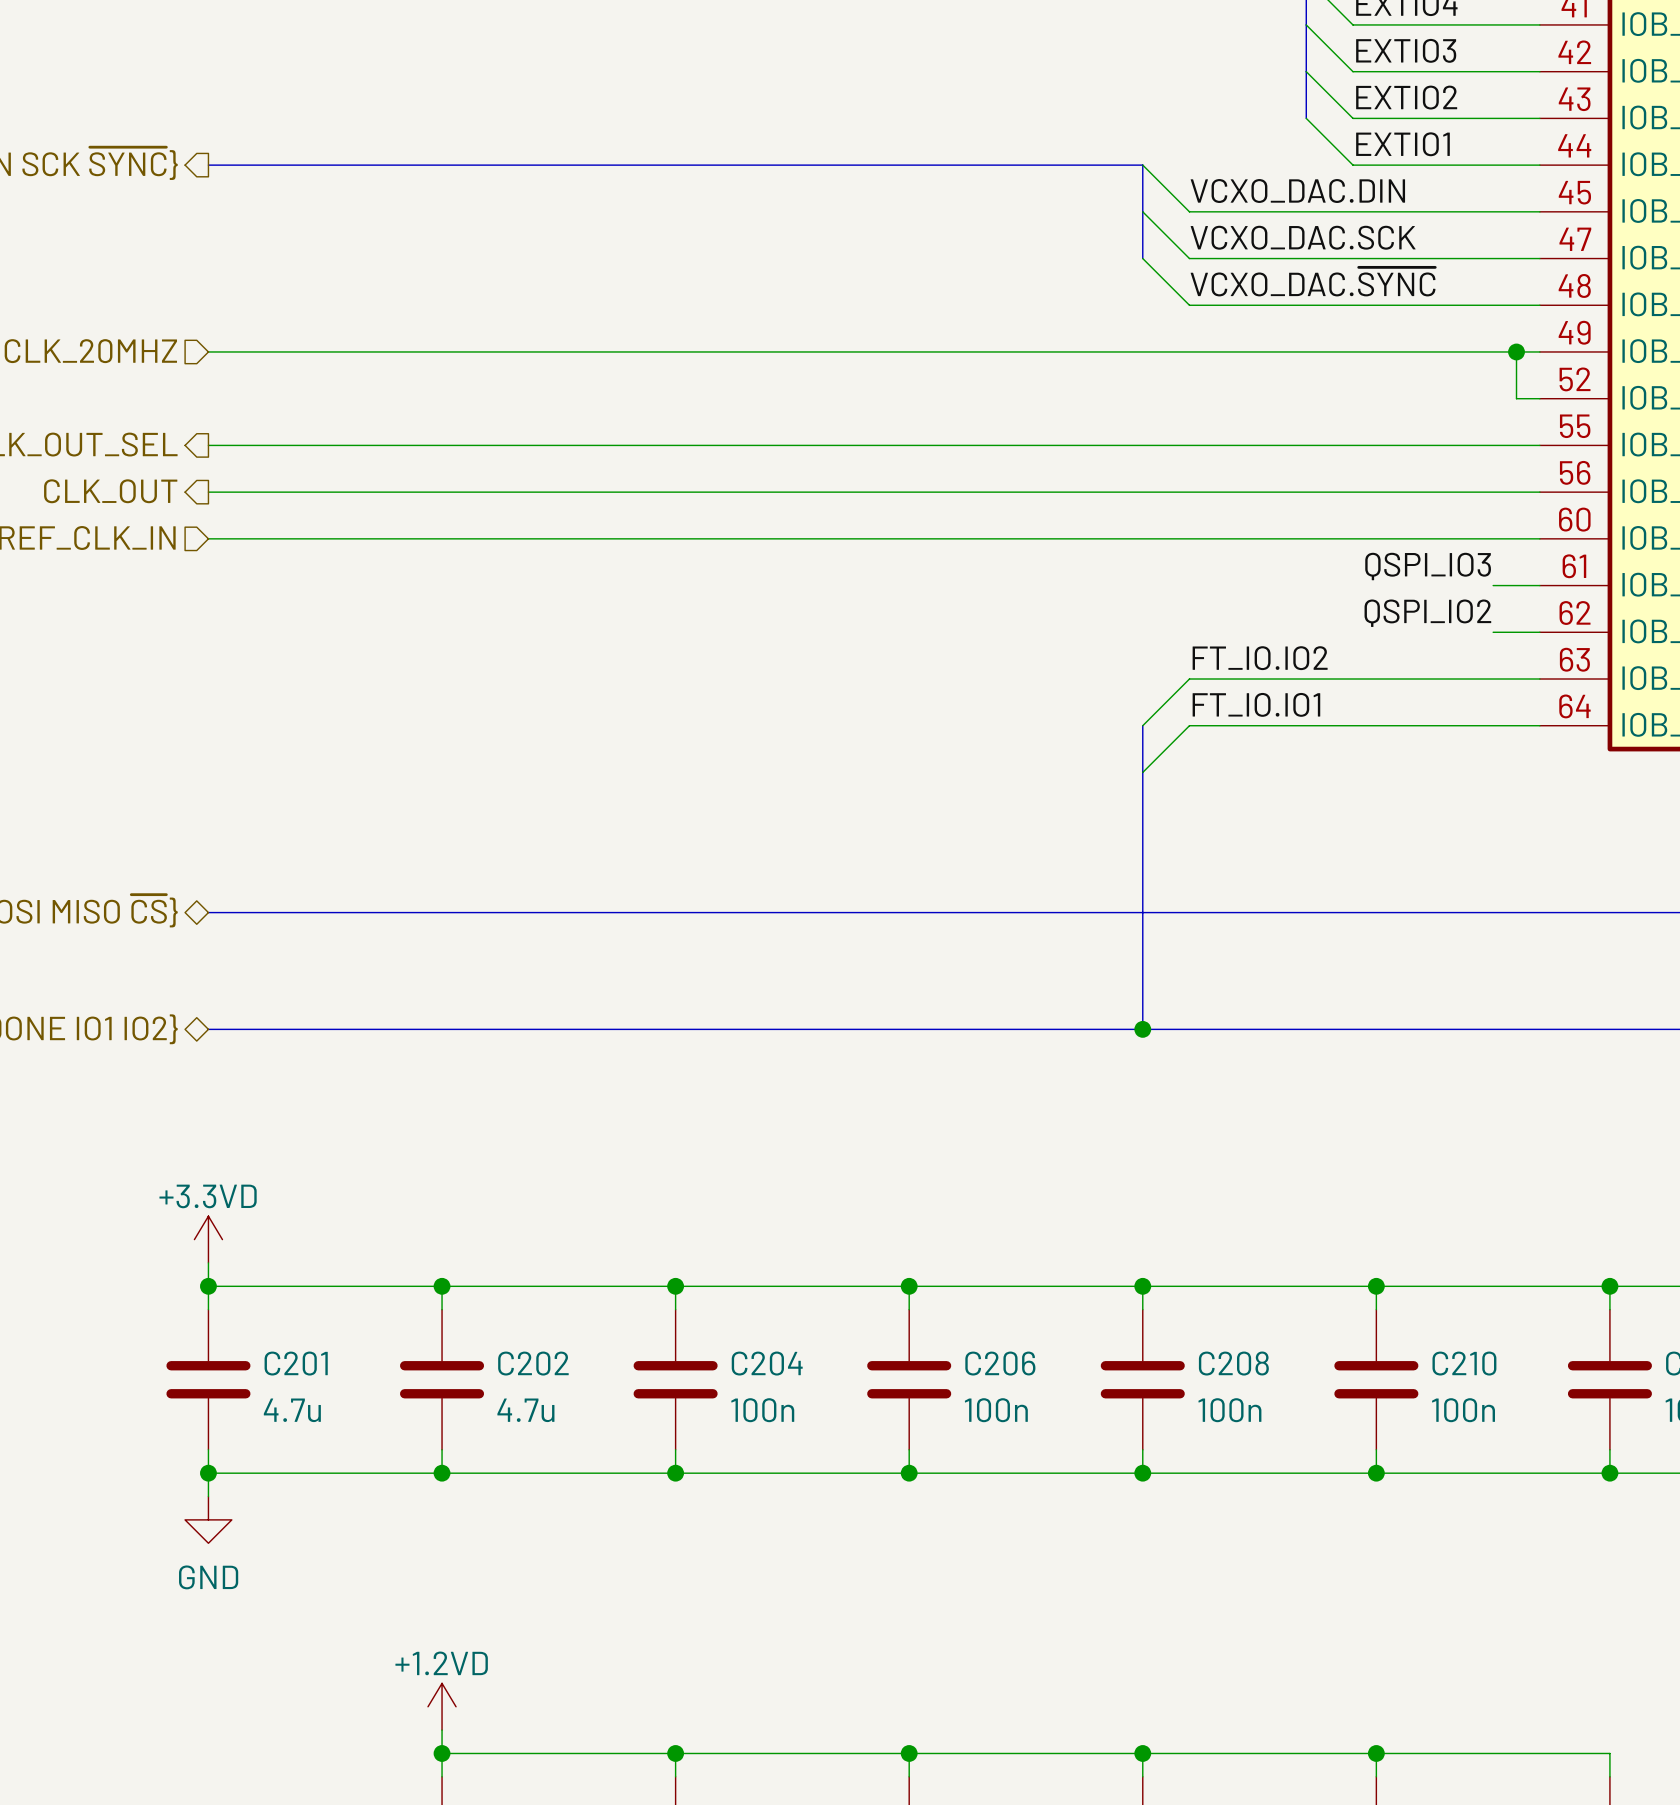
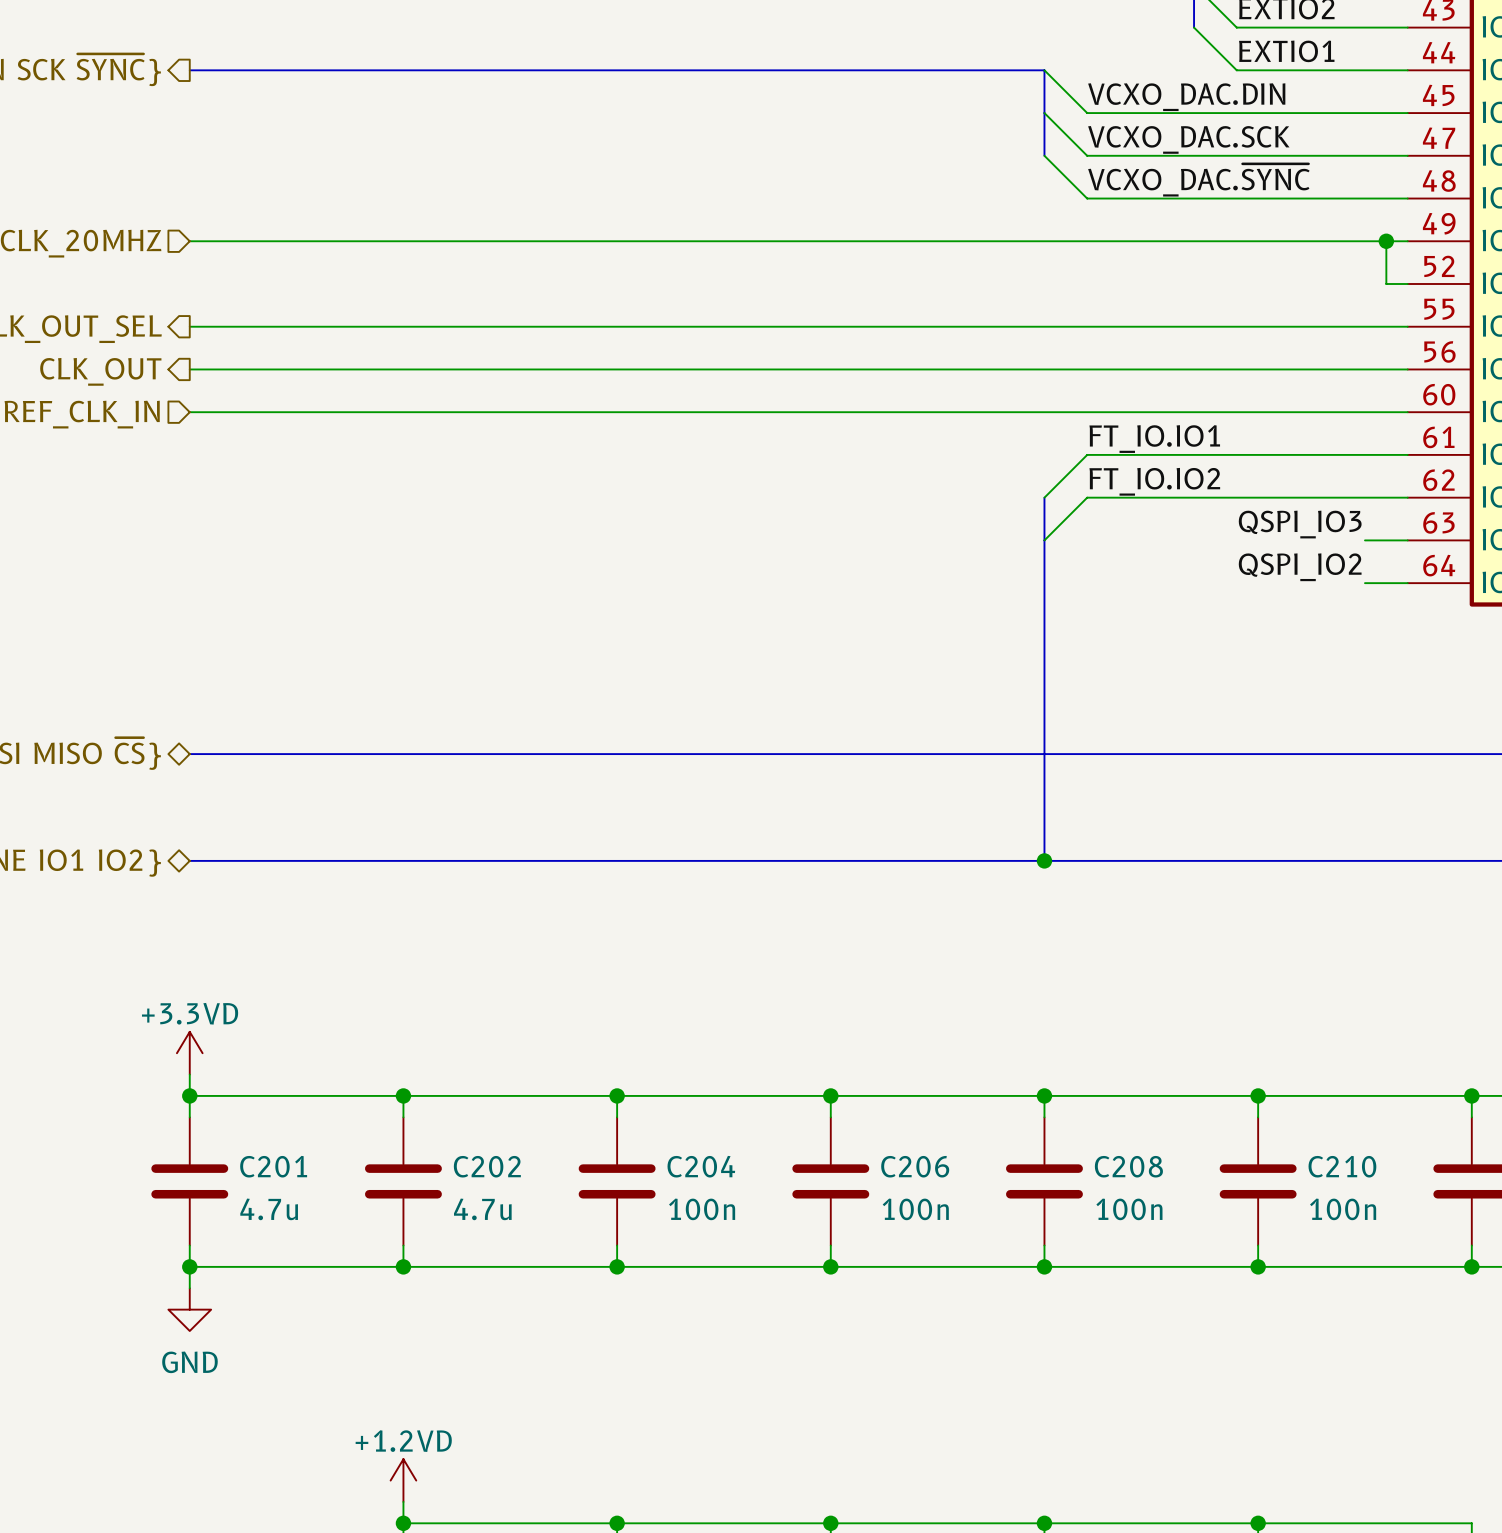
label position: QSPI_IO3 (1428, 566) -> QSPI_IO3 (1300, 524)
label position: QSPI_IO2 (1427, 613) -> QSPI_IO2 (1300, 567)
bus: none -> (1044, 497) (1044, 583)
label position: FT_IO.IO2 (1260, 658) -> FT_IO.IO2 (1154, 481)
wire: (1493, 679) (1189, 679) (1142, 725) -> (1364, 454) (1087, 454) (1044, 497)
label position: FT_IO.IO1 (1256, 704) -> FT_IO.IO1 (1154, 439)
wire: (1493, 725) (1189, 725) (1142, 772) -> (1364, 497) (1087, 497) (1044, 540)

